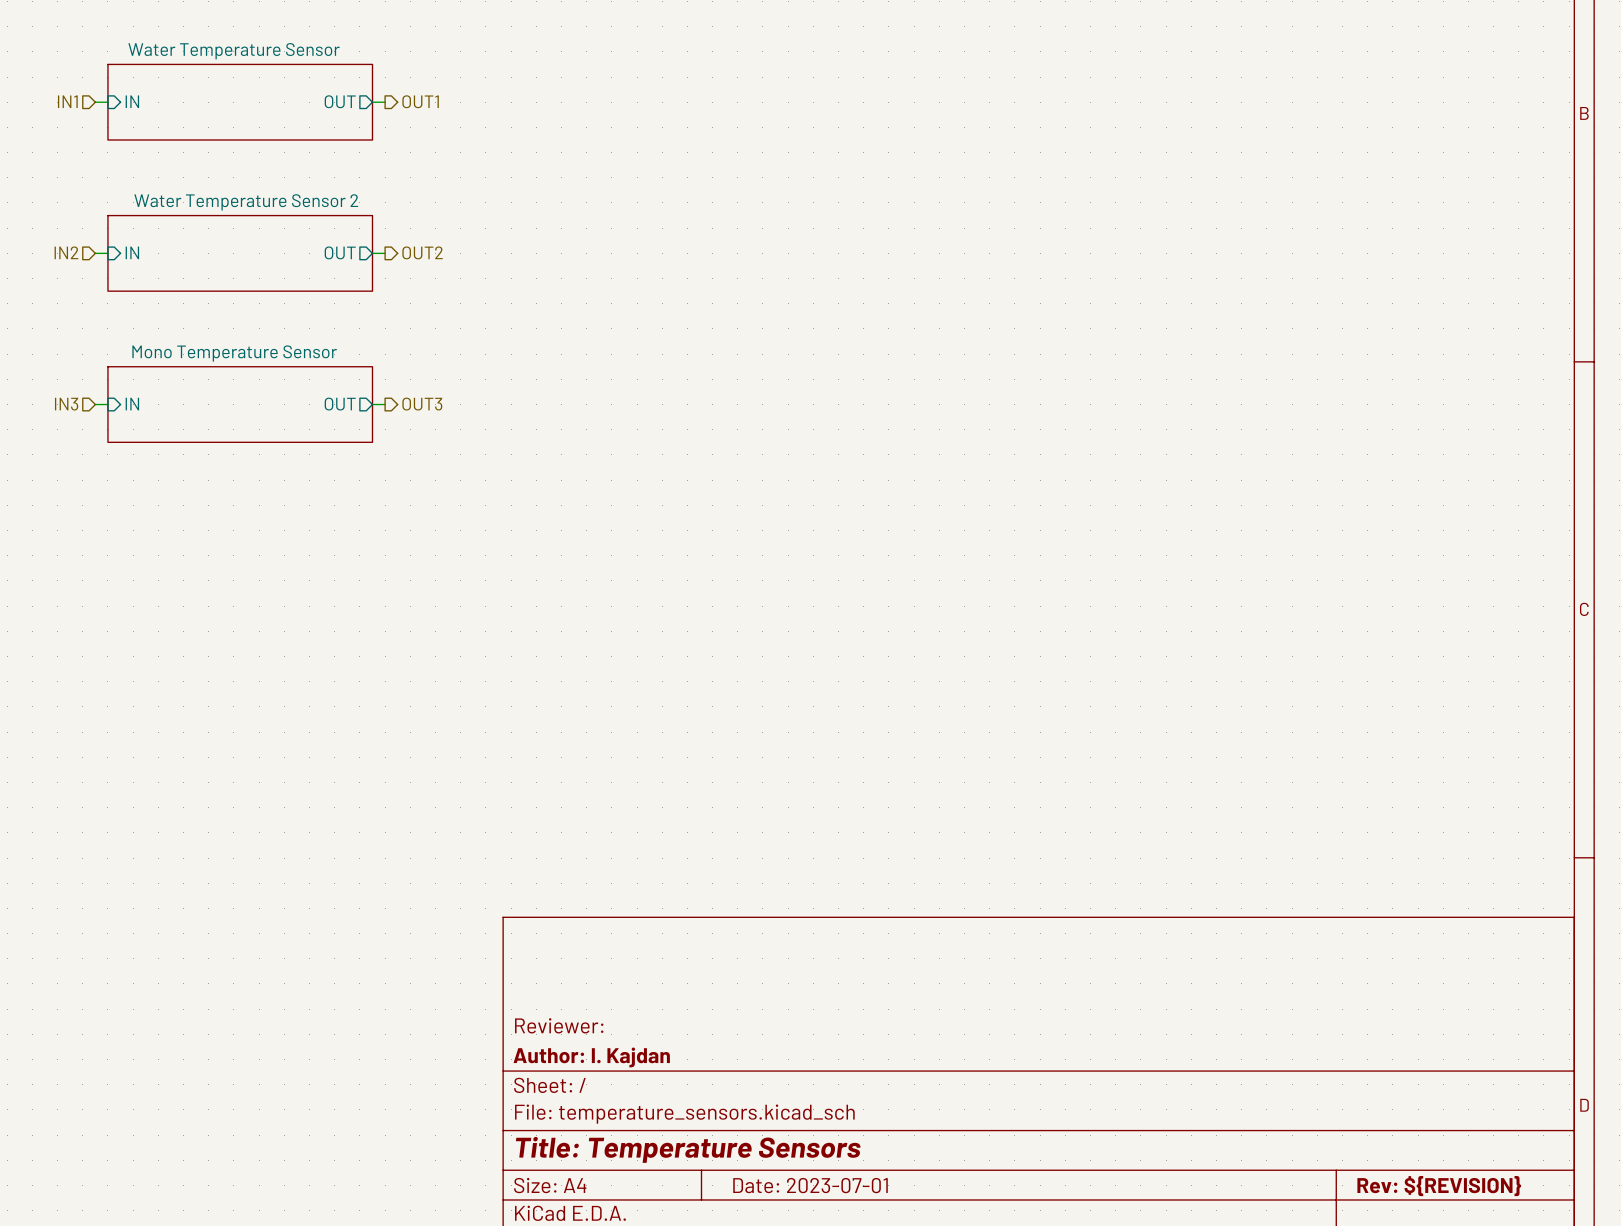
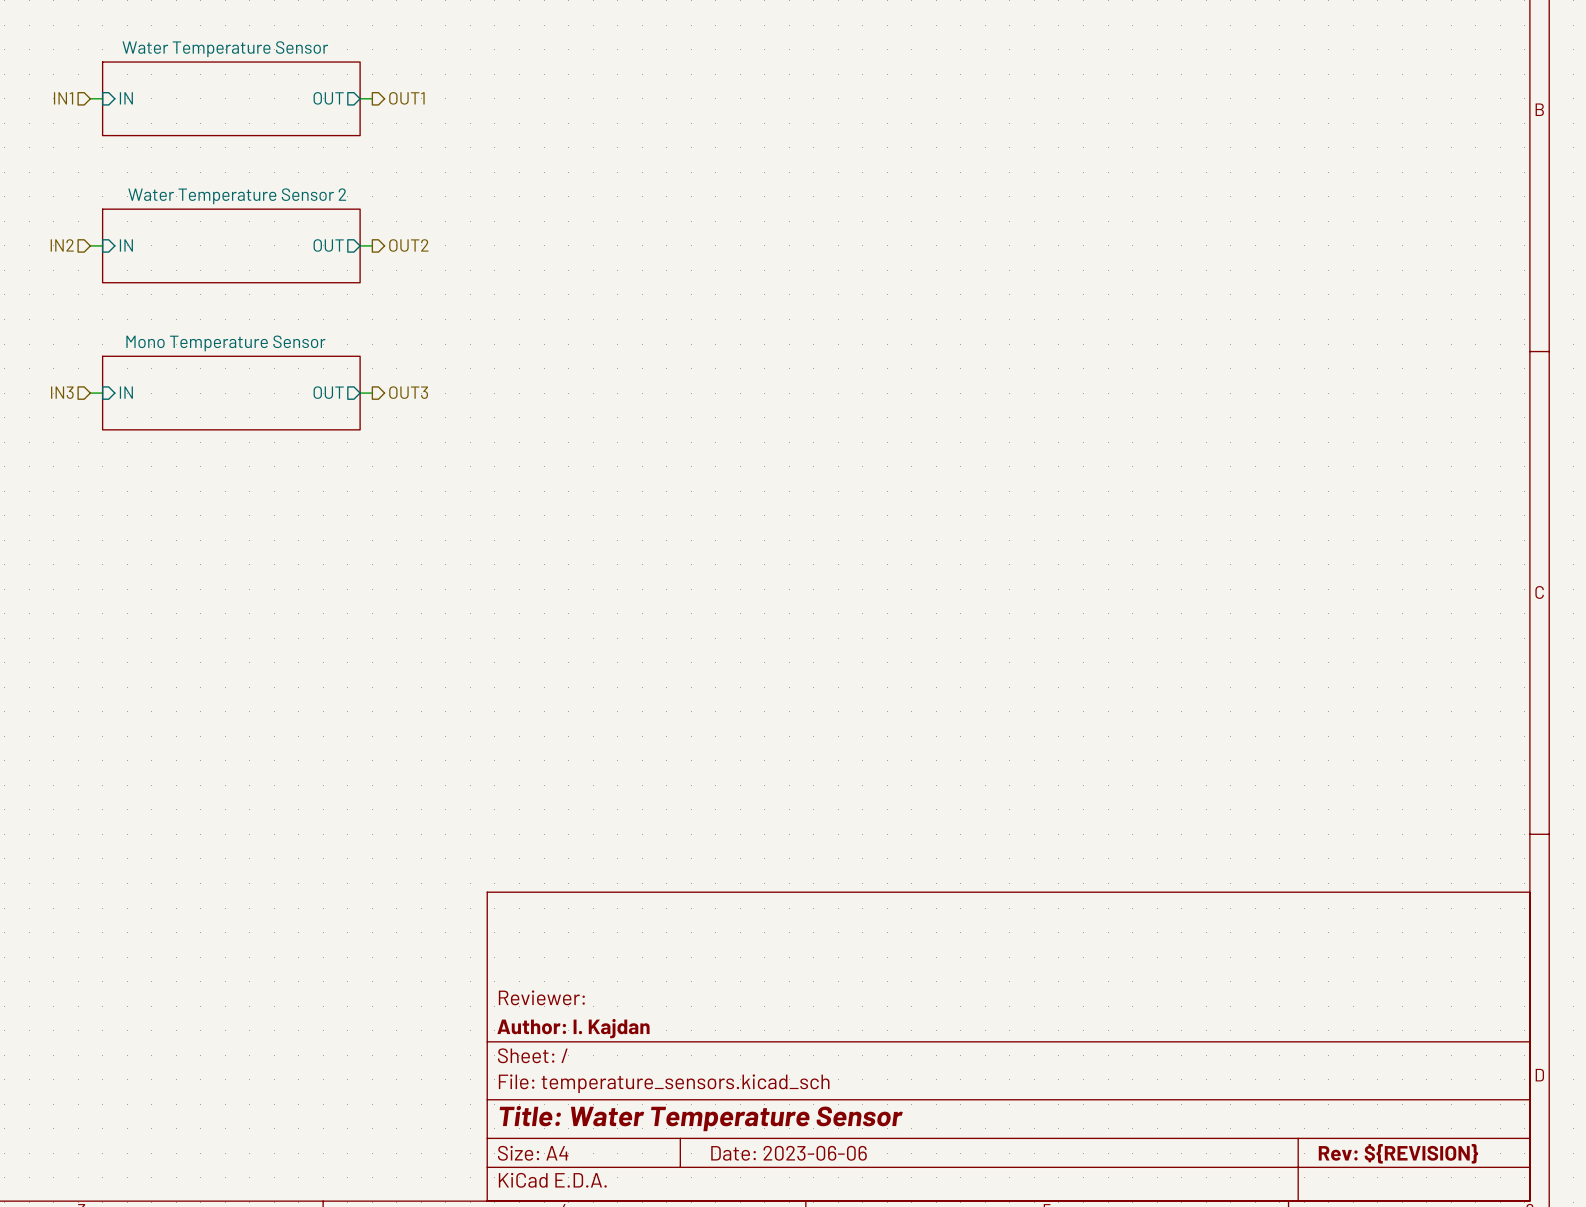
title block: Title: Temperature Sensors (688, 1149) -> Title: Water Temperature Sensor (701, 1118)
title block: Date: 2023-07-01 (810, 1185) -> Date: 2023-06-06 (789, 1153)

